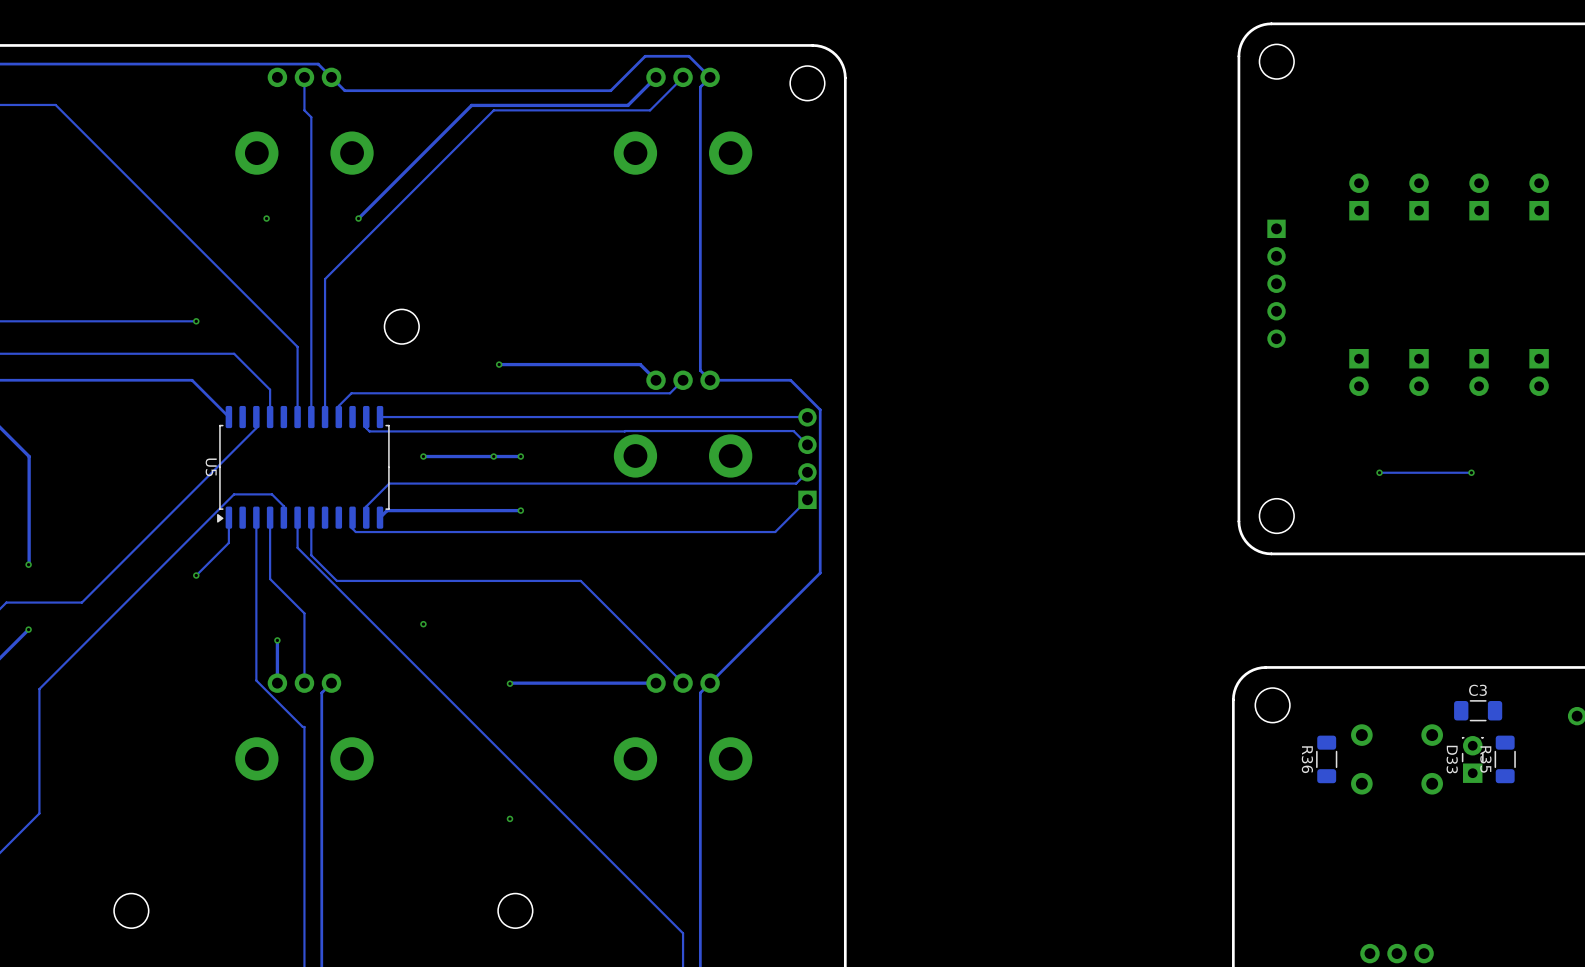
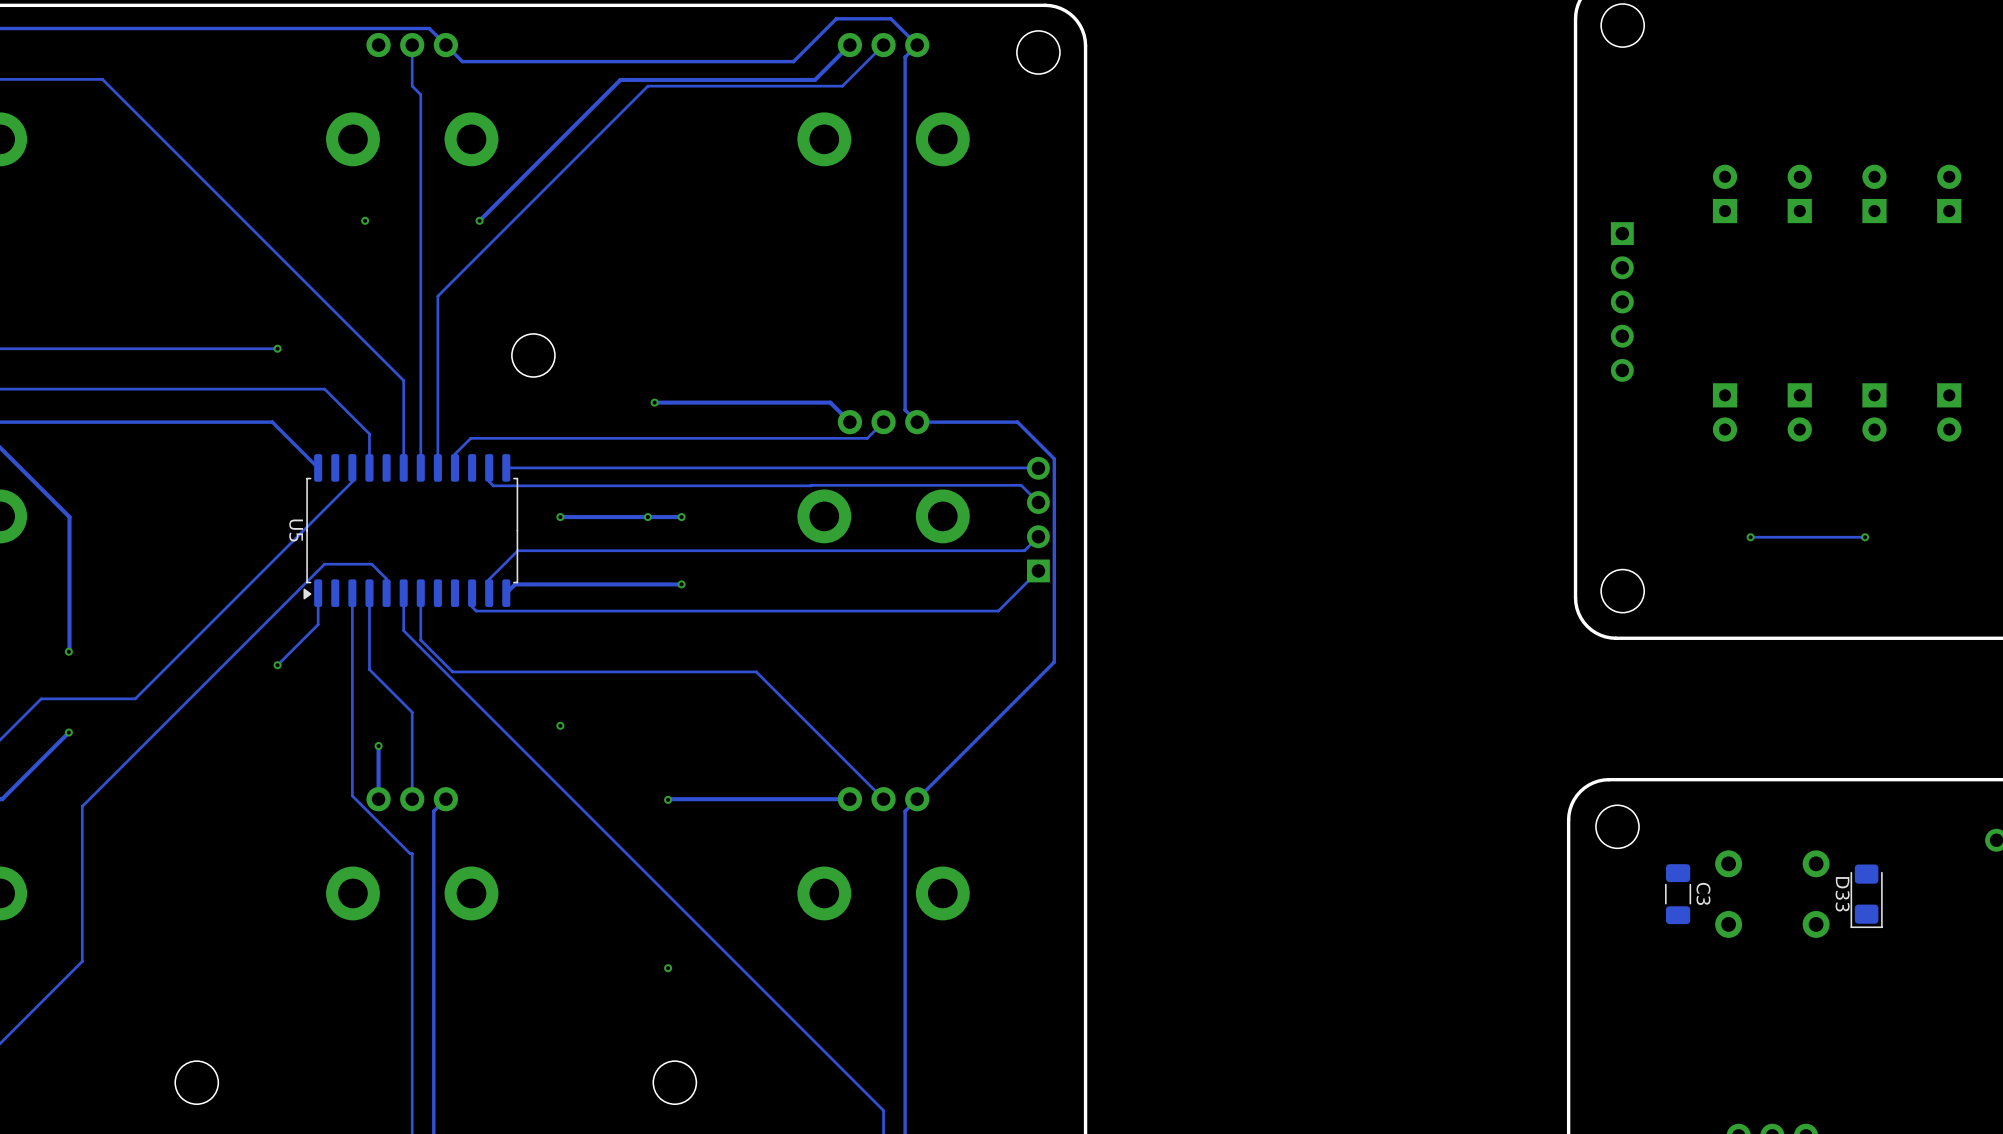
C3 rotation: 0° (1478, 710) -> 90° clockwise (1678, 894)
C3 position: (1478, 710) -> (1678, 894)
D33 footprint: [1461, 735, 1484, 783] -> [1850, 864, 1883, 929]
R36: (1326, 759) -> none
R35: (1505, 759) -> none

